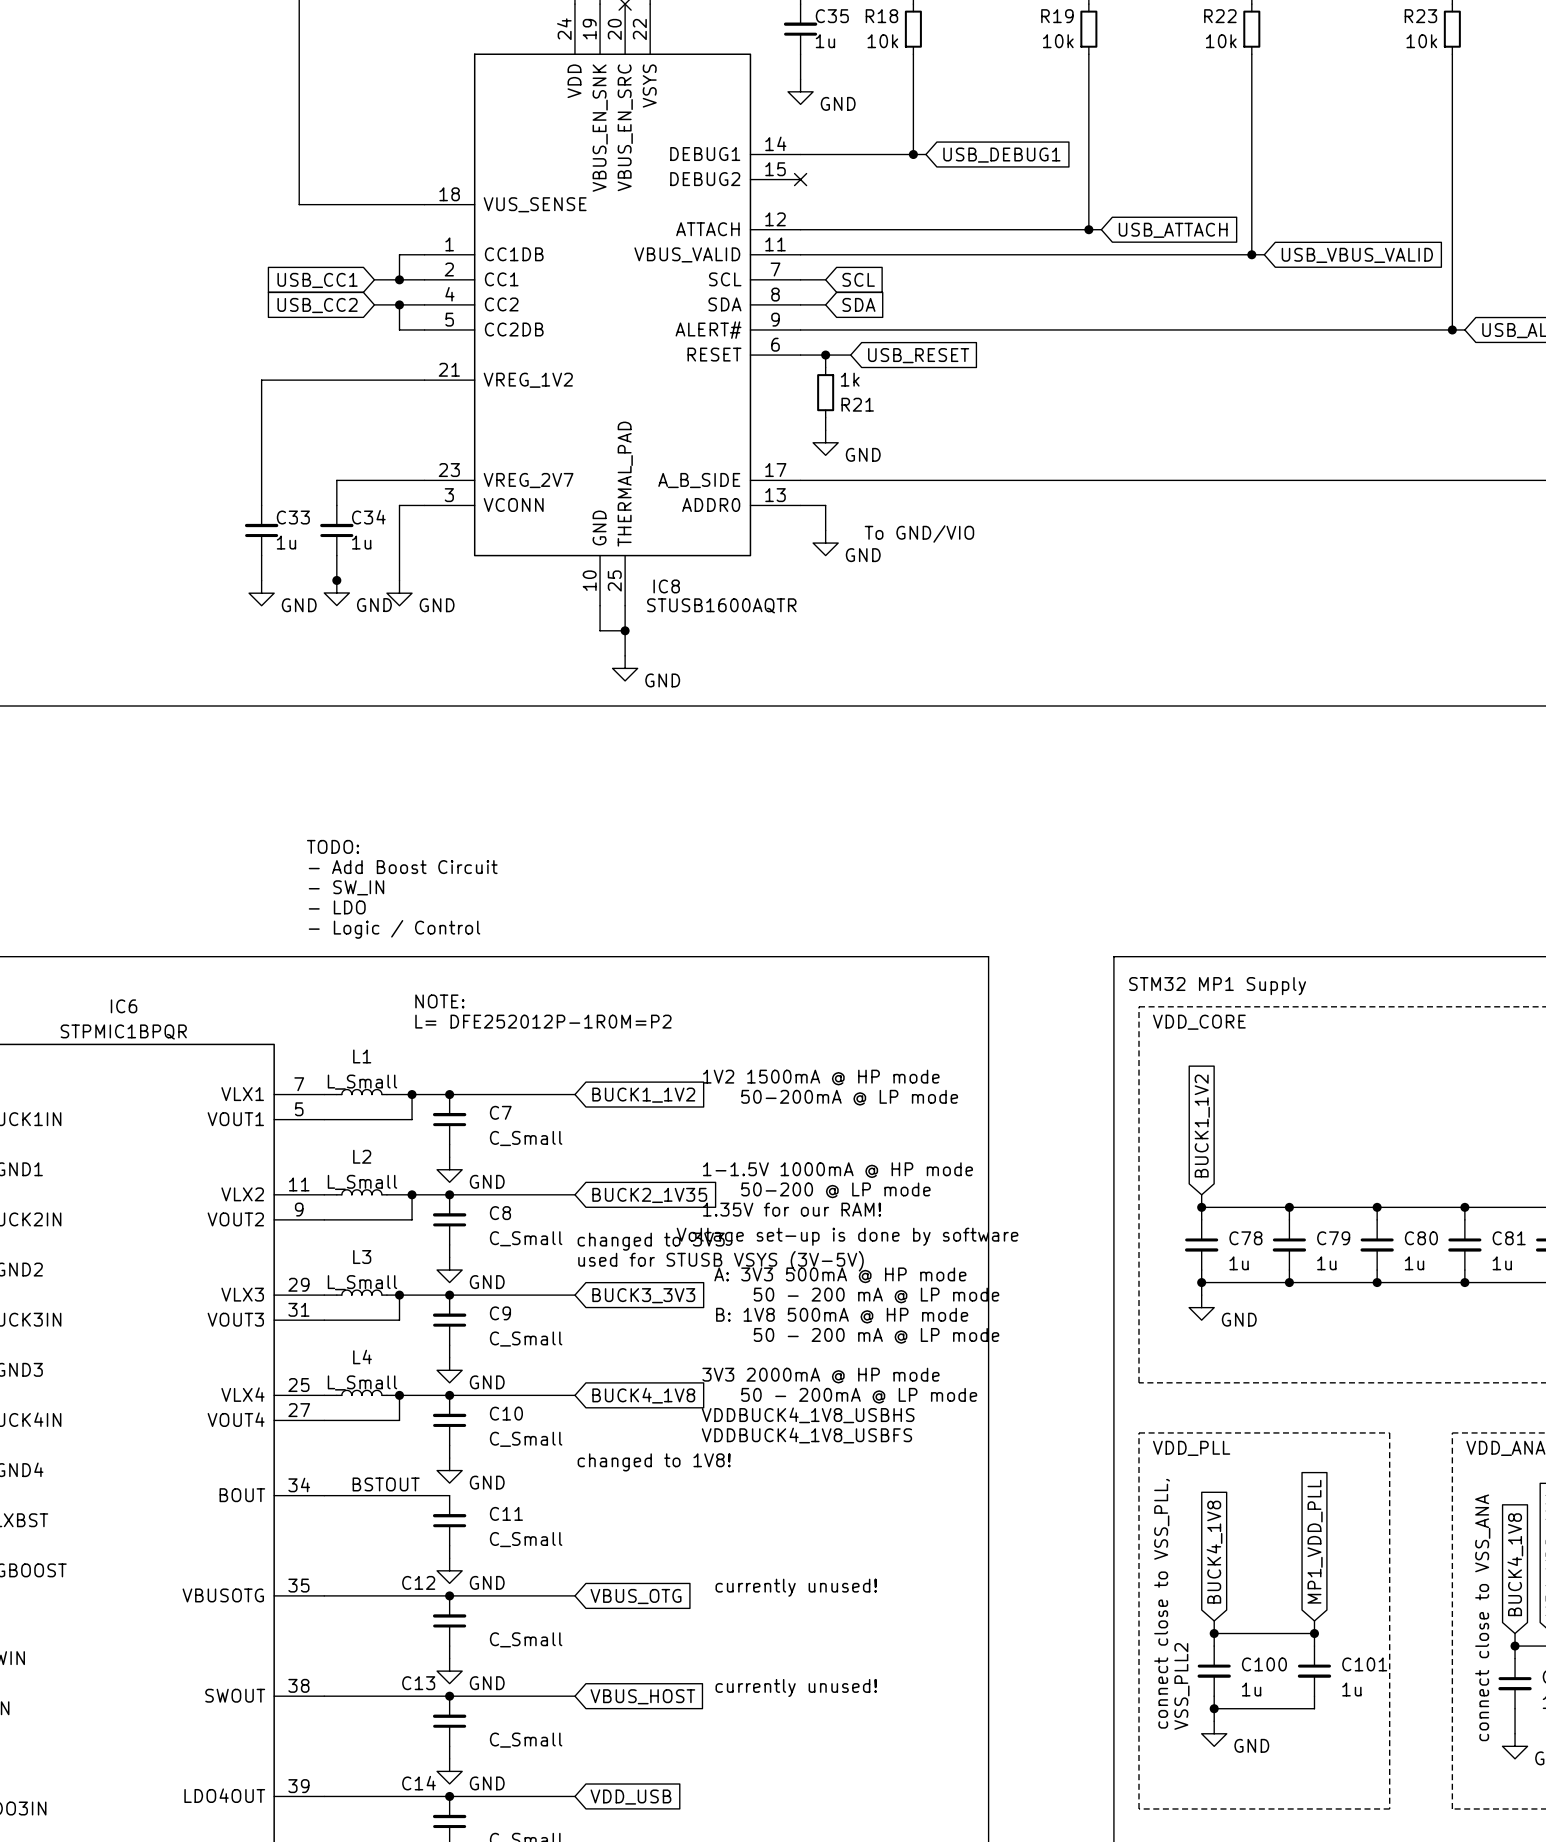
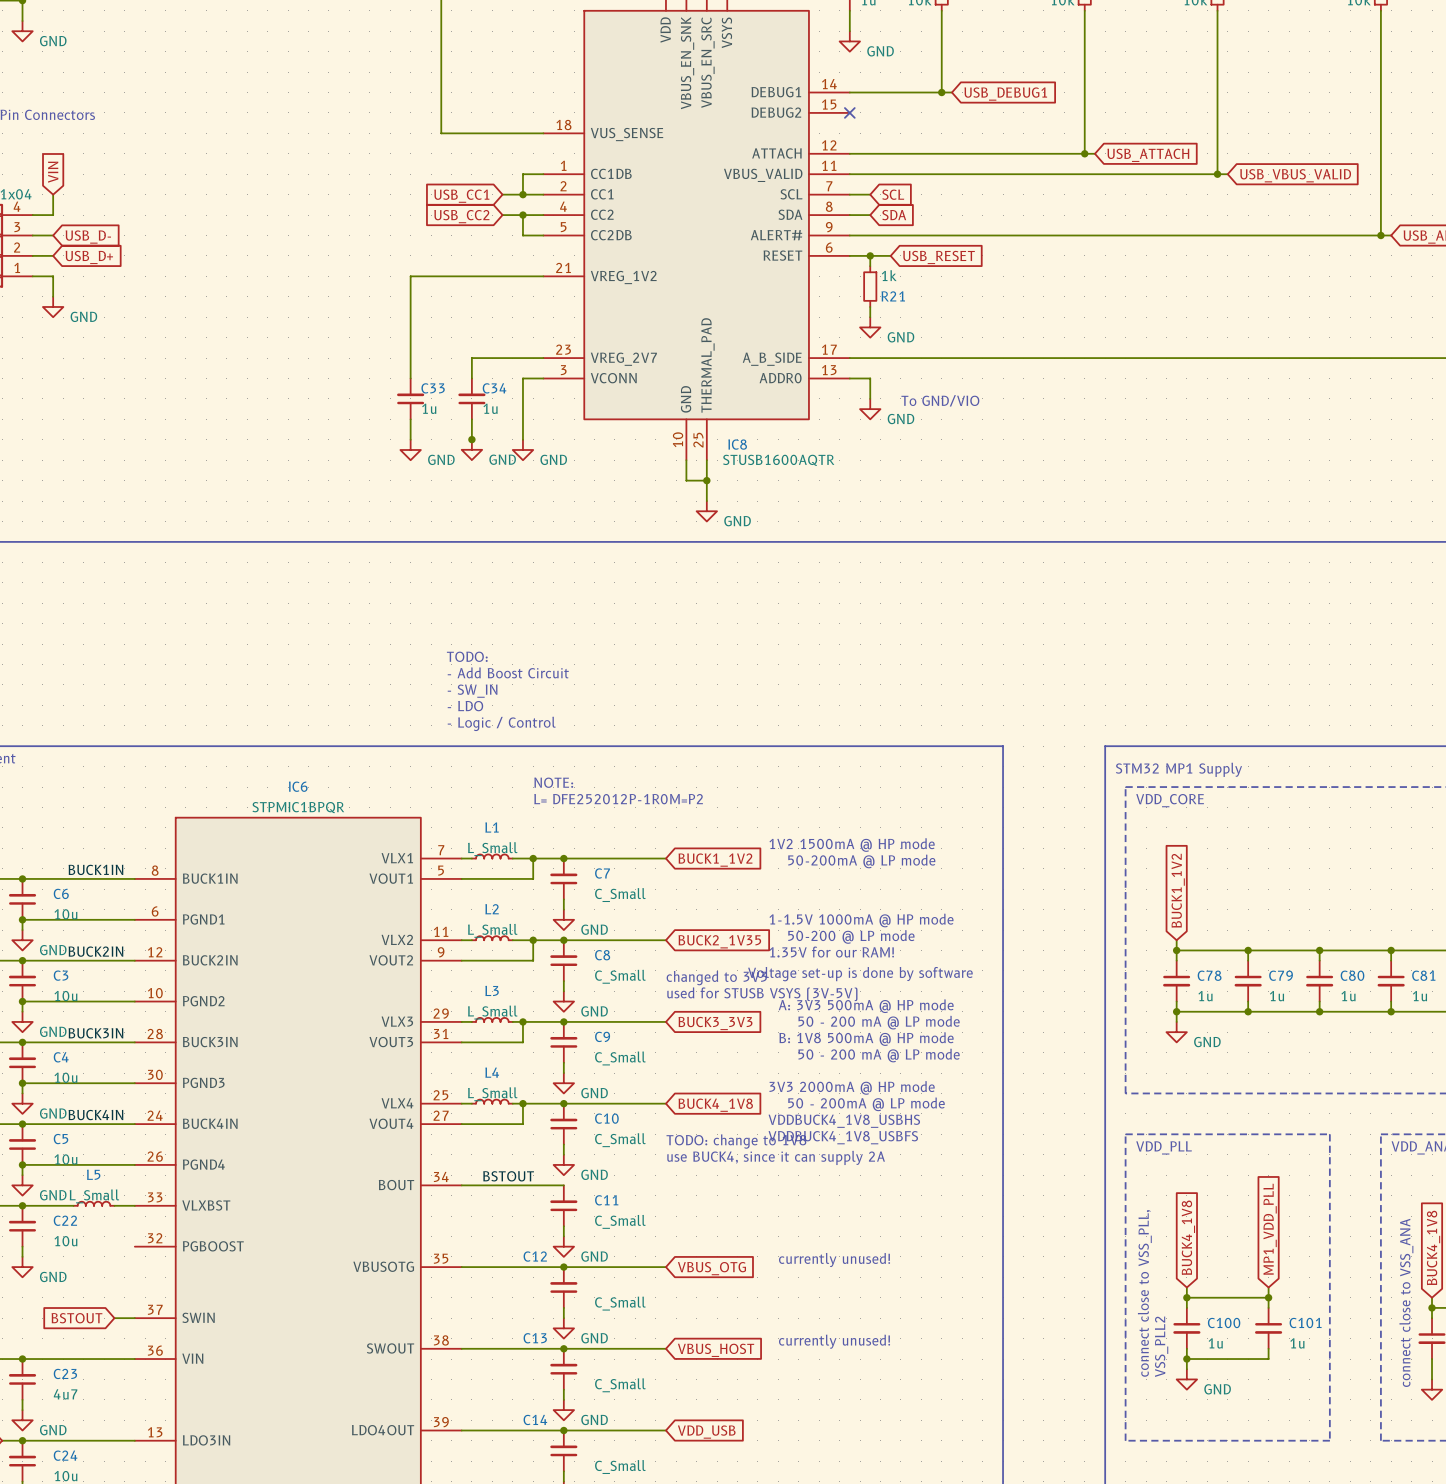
text: none -> TODO: change to 1V8 (736, 1141)
text: changed to 1V8! (654, 1462) -> use BUCK4, since it can supply 2A (776, 1157)

